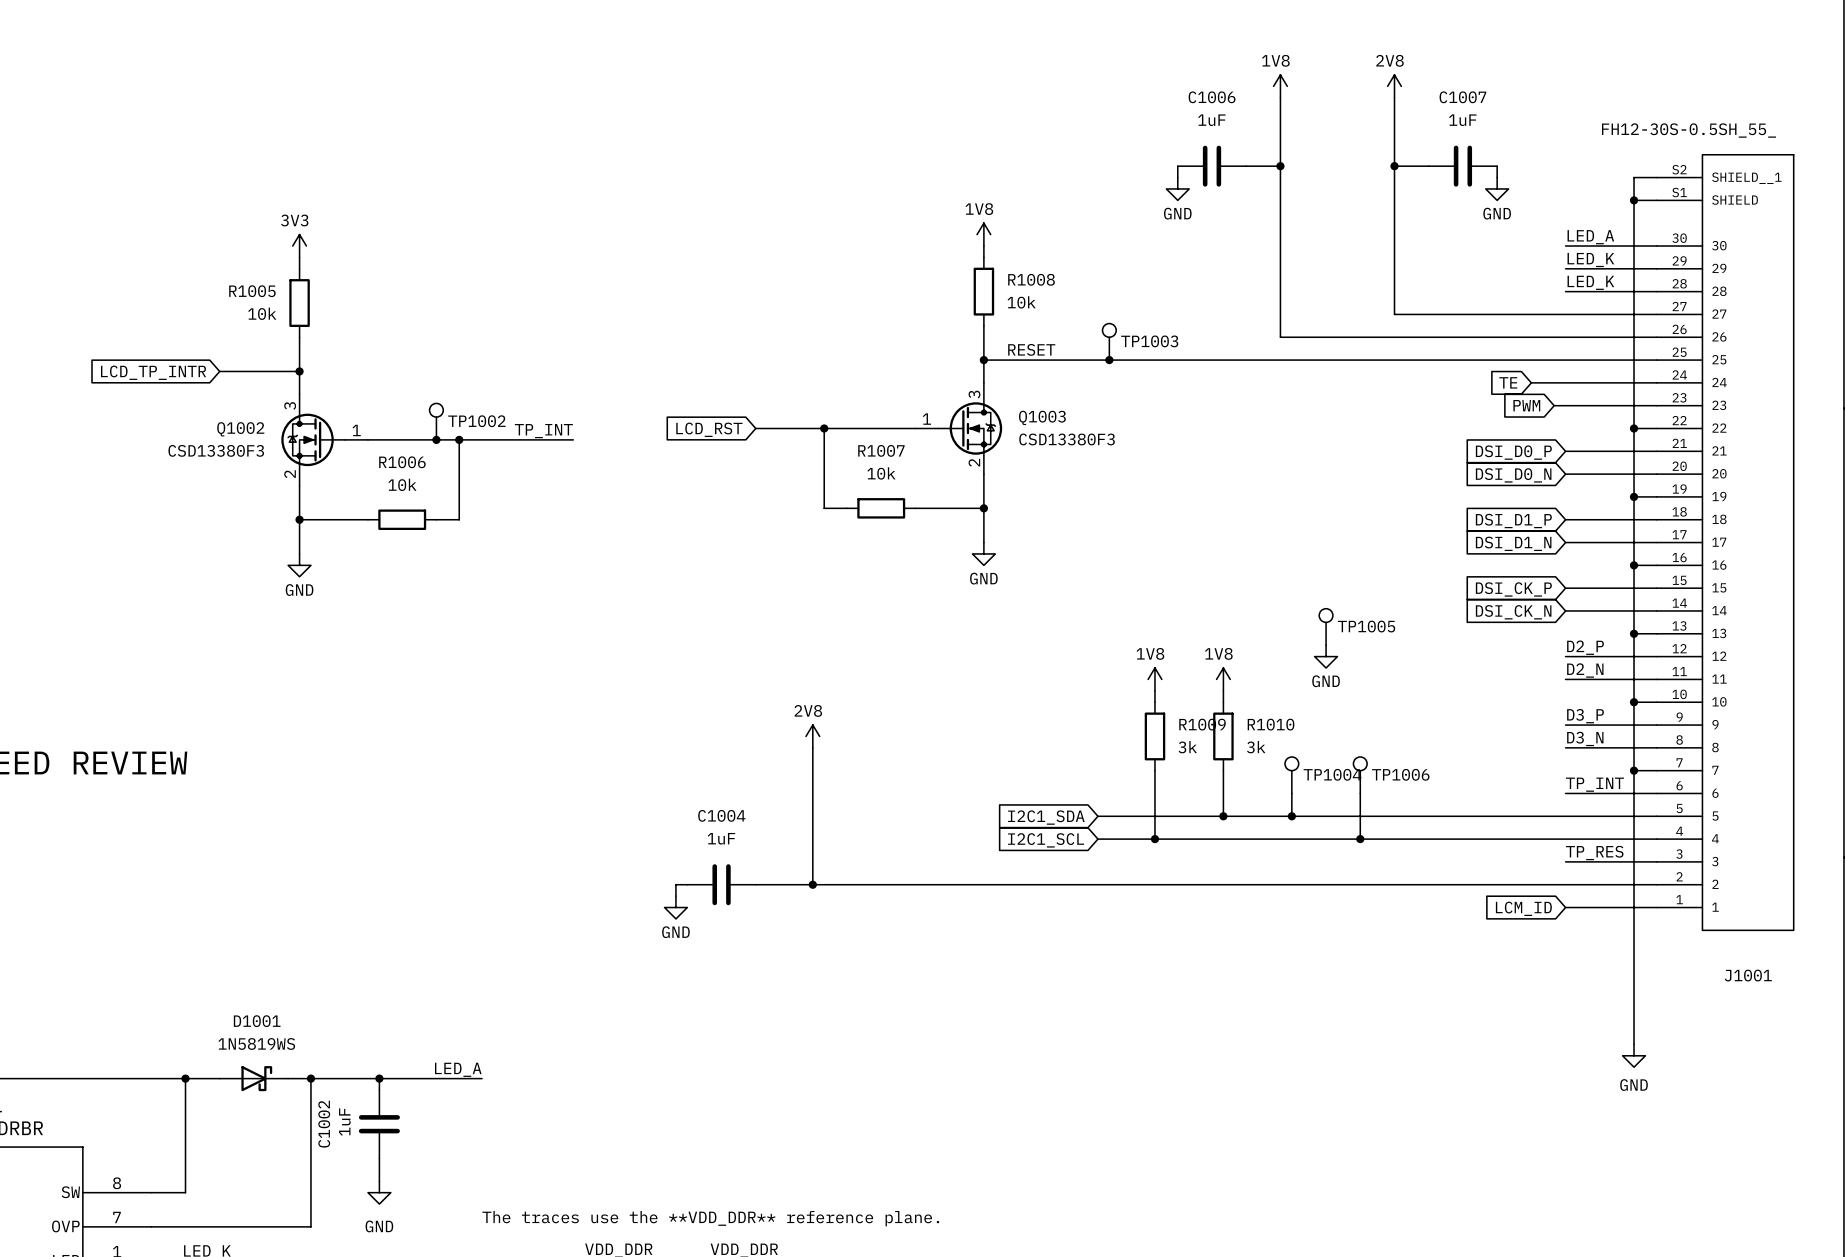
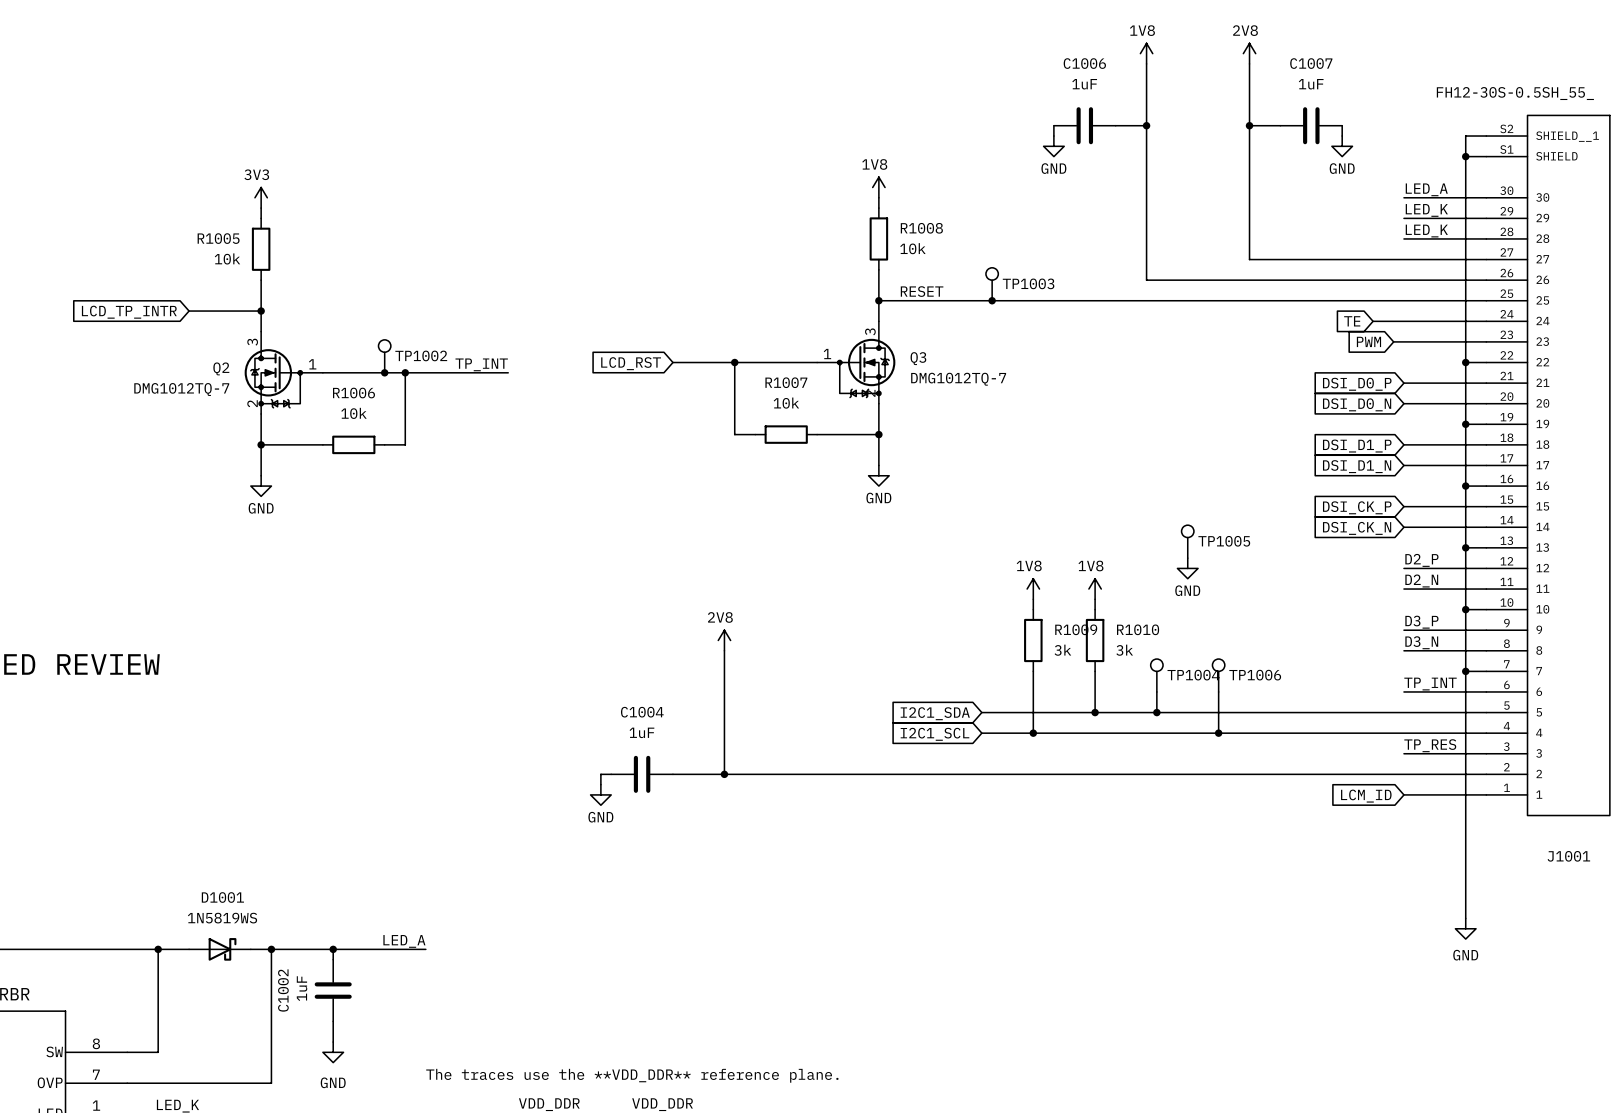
Q1003: CSD13380F3 (958, 428) -> none
Q3: none -> DMG1012TQ-7 (856, 362)
Q1002: CSD13380F3 (324, 439) -> none
Q2: none -> DMG1012TQ-7 (283, 372)

